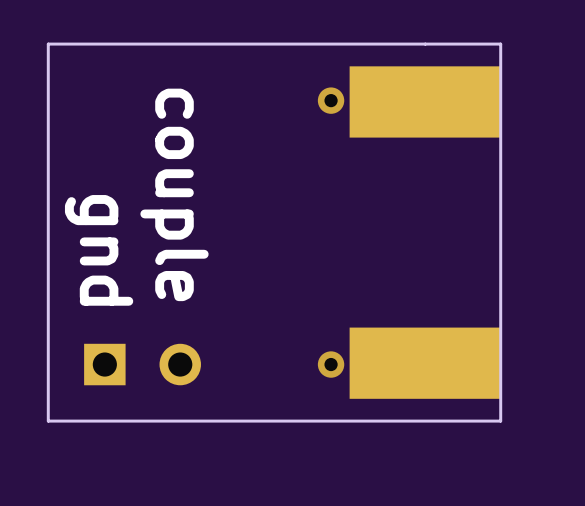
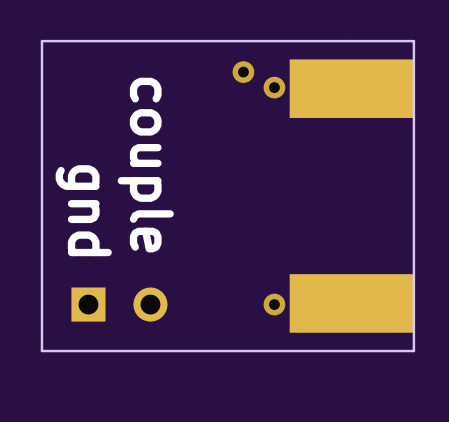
via: none -> (243, 72)

